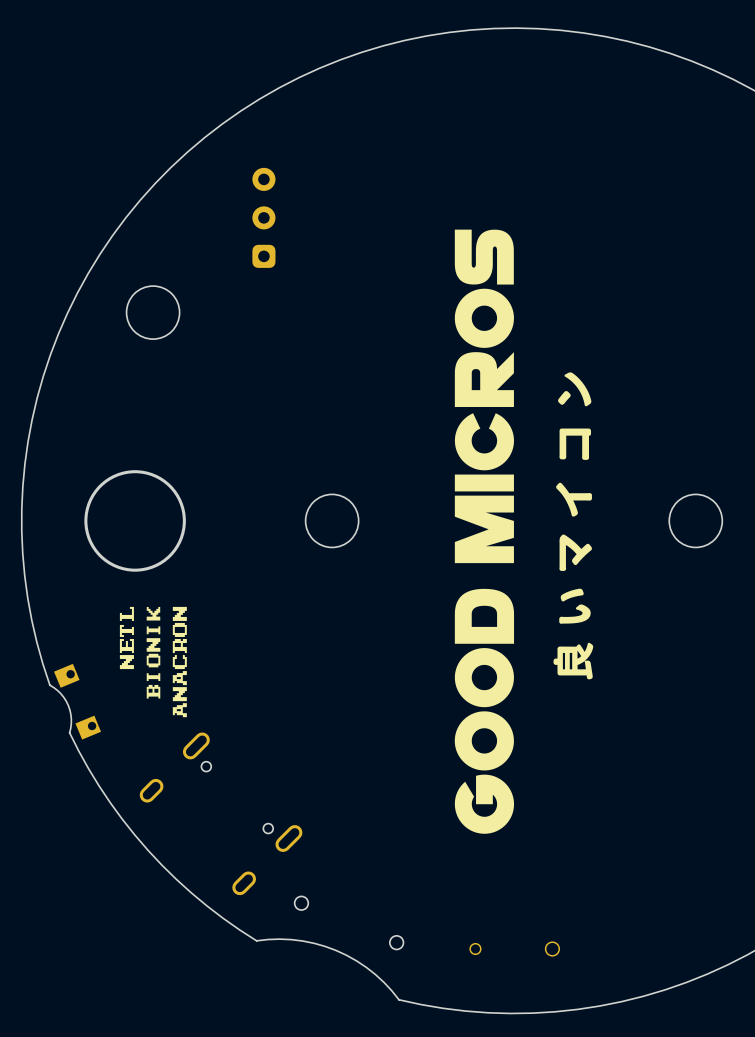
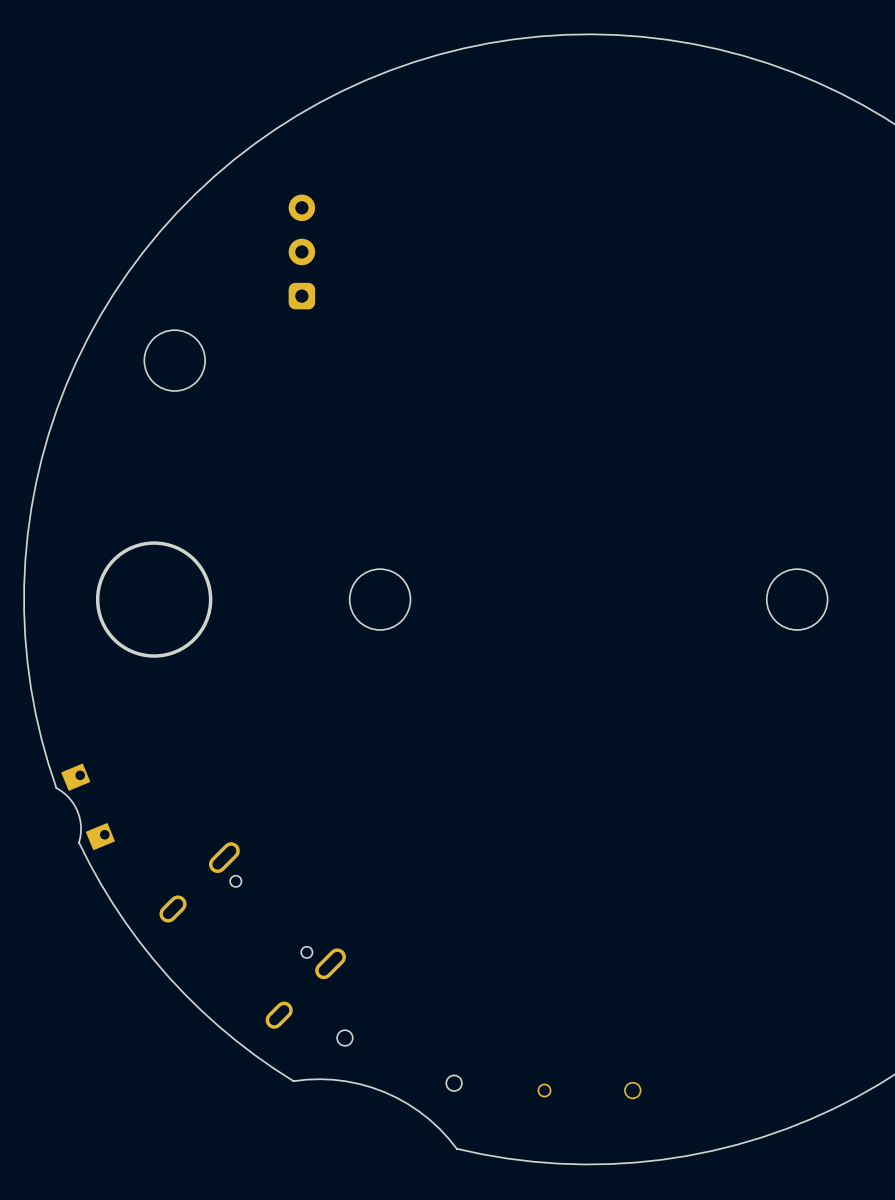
drawing: [454, 229, 514, 564] -> none
drawing: [558, 372, 592, 407] -> none
drawing: [559, 428, 592, 460] -> none
drawing: [556, 482, 592, 624] -> none
drawing: [454, 588, 515, 834] -> none
drawing: [119, 606, 187, 718] -> none
drawing: [553, 642, 594, 680] -> none

